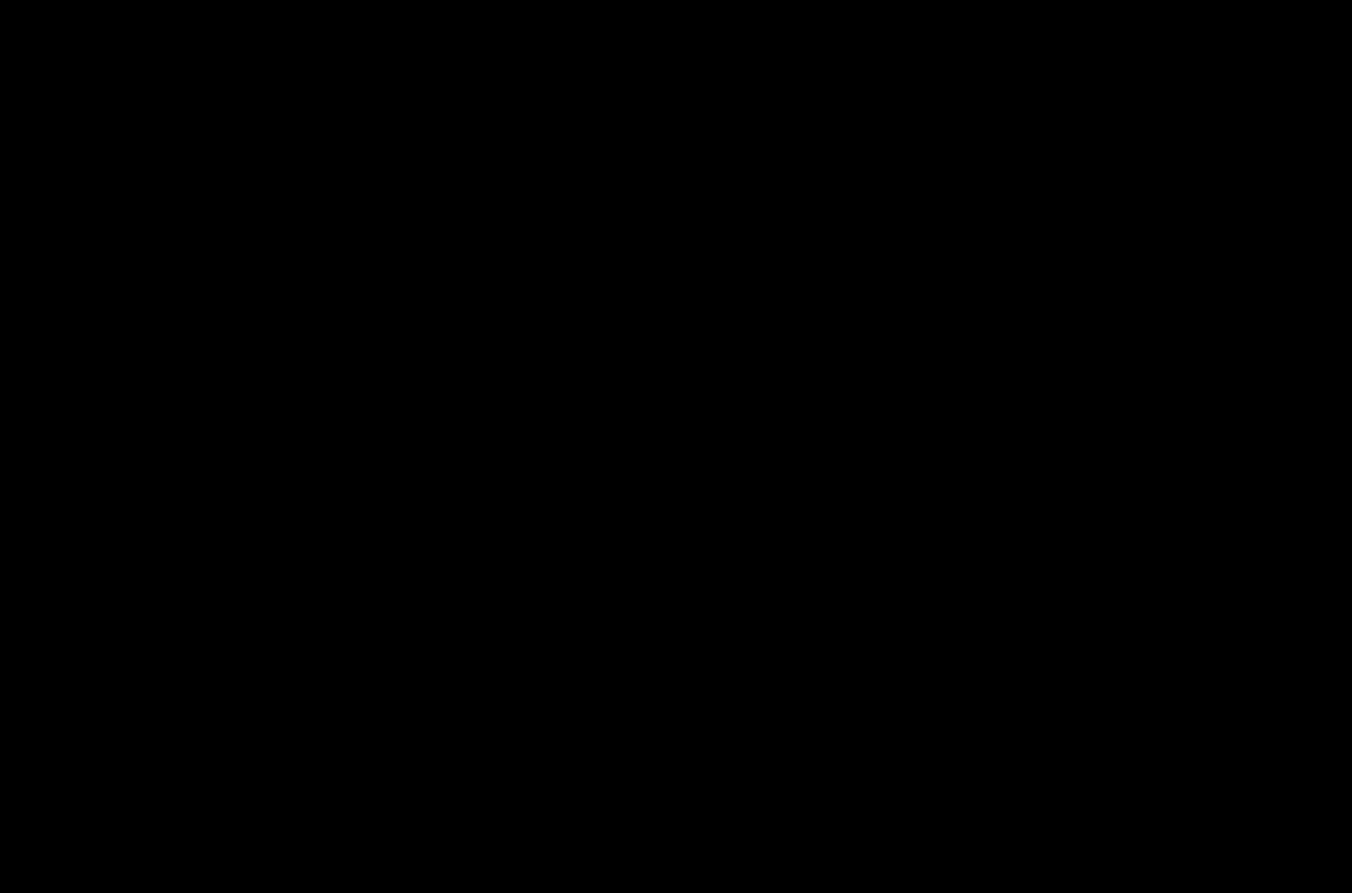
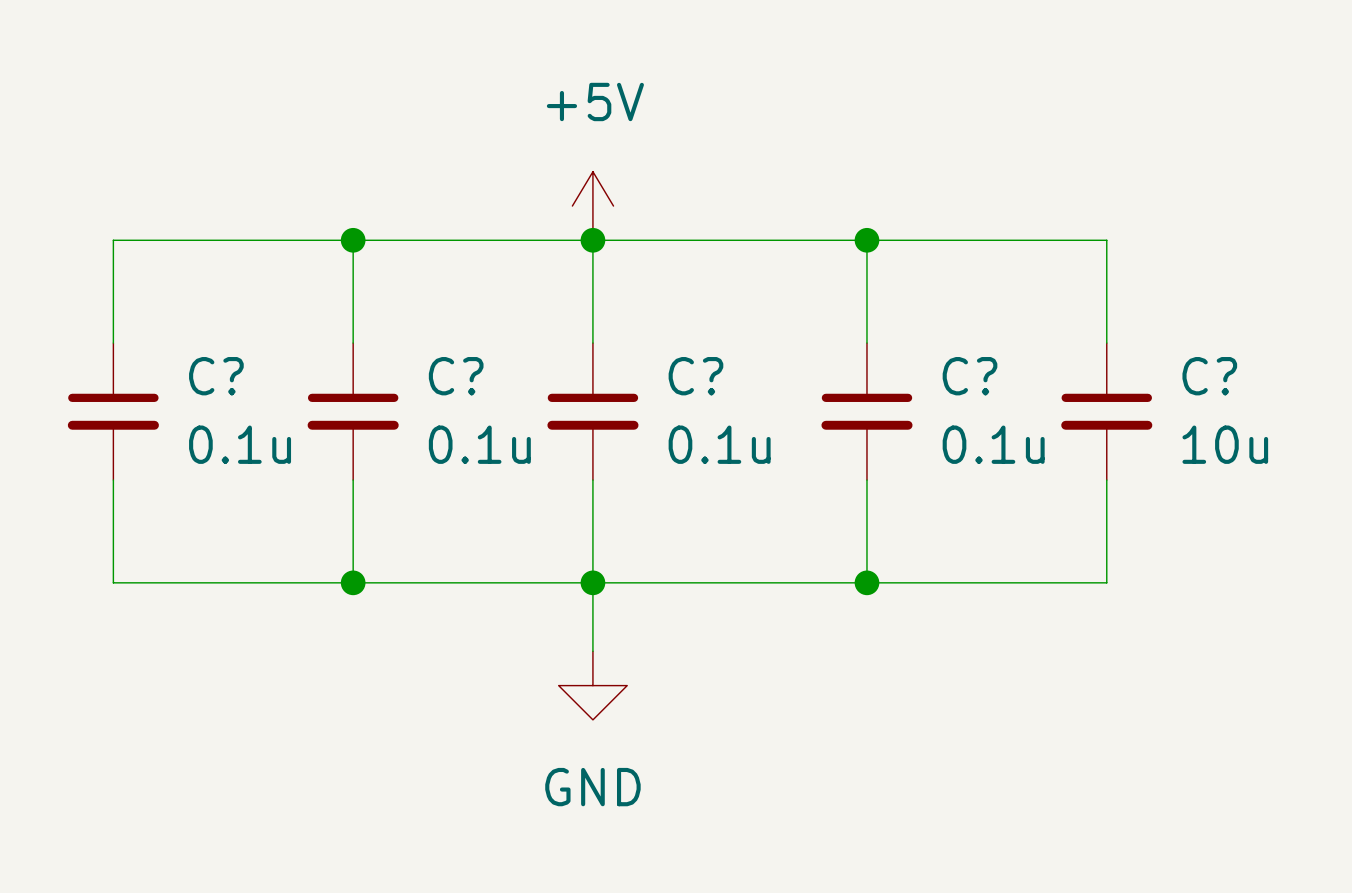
power symbol: none -> +5V (592, 206)
wire: none -> (353, 240) (353, 343)
junction: none -> (353, 240)
wire: none -> (592, 240) (592, 343)
junction: none -> (592, 240)
wire: none -> (866, 240) (866, 343)
junction: none -> (866, 240)
wire: none -> (113, 343) (113, 240) (1106, 240) (1106, 343)
C?: none -> 0.1u (113, 411)
C?: none -> 0.1u (353, 411)
C?: none -> 0.1u (592, 411)
C?: none -> 0.1u (866, 411)
C?: none -> 10u (1106, 411)
wire: none -> (113, 480) (113, 582) (1106, 582) (1106, 480)
wire: none -> (353, 480) (353, 582)
wire: none -> (592, 480) (592, 651)
wire: none -> (866, 480) (866, 582)
junction: none -> (353, 582)
junction: none -> (592, 582)
junction: none -> (866, 582)
power symbol: none -> GND (592, 685)

